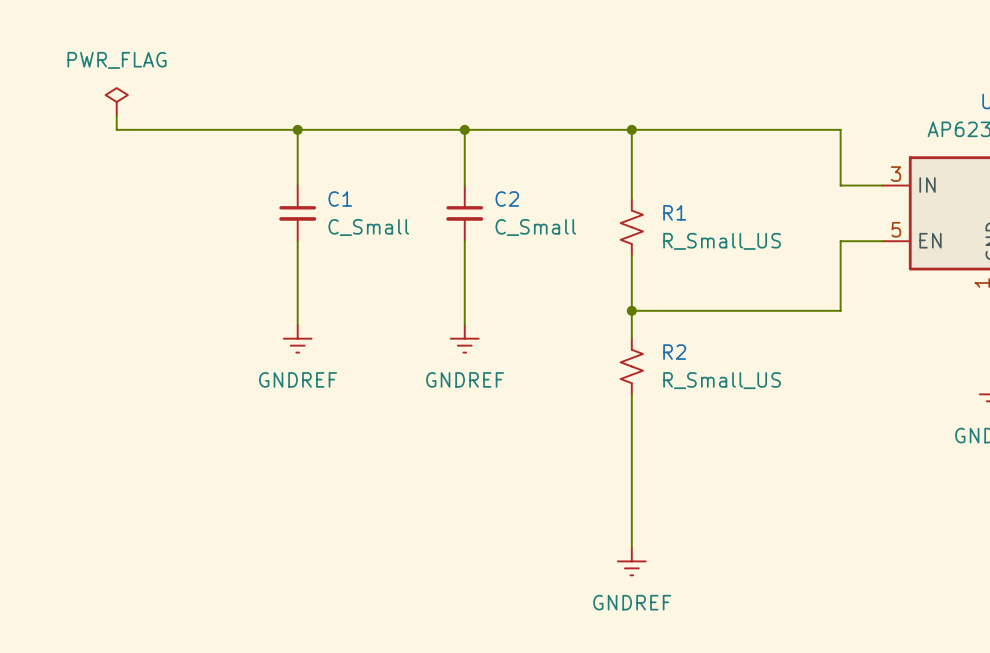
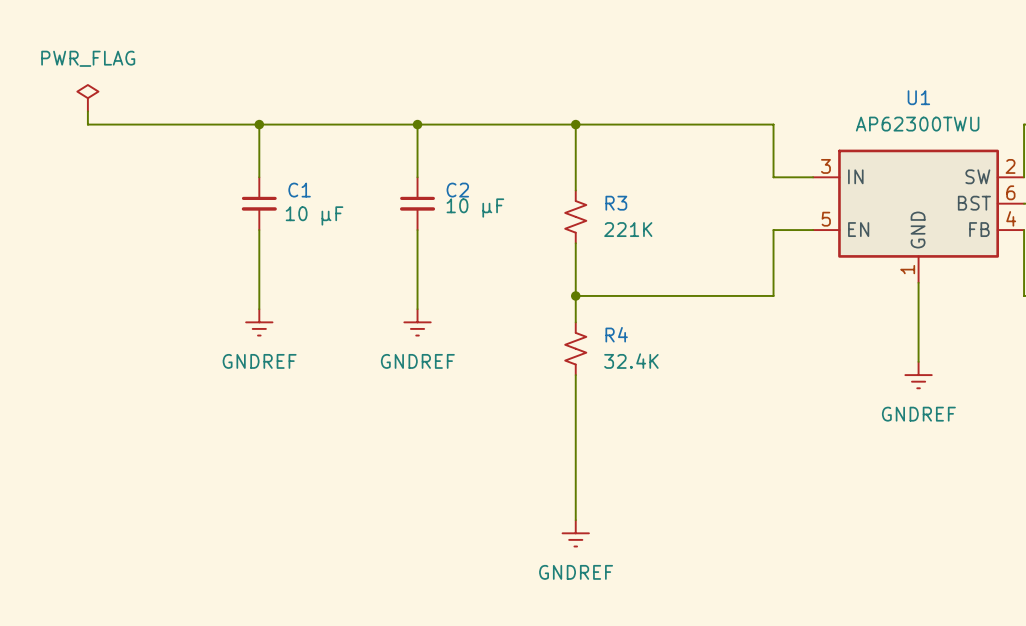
R1 name: R1 (674, 212) -> R3 (616, 203)
C1 value: C_Small (368, 227) -> 10 µF (314, 215)
C2 value: C_Small (535, 227) -> 10 µF (475, 208)
R1 value: R_Small_US (722, 241) -> 221K (628, 229)
R2 name: R2 (674, 352) -> R4 (616, 334)
R2 value: R_Small_US (722, 380) -> 32.4K (631, 361)

